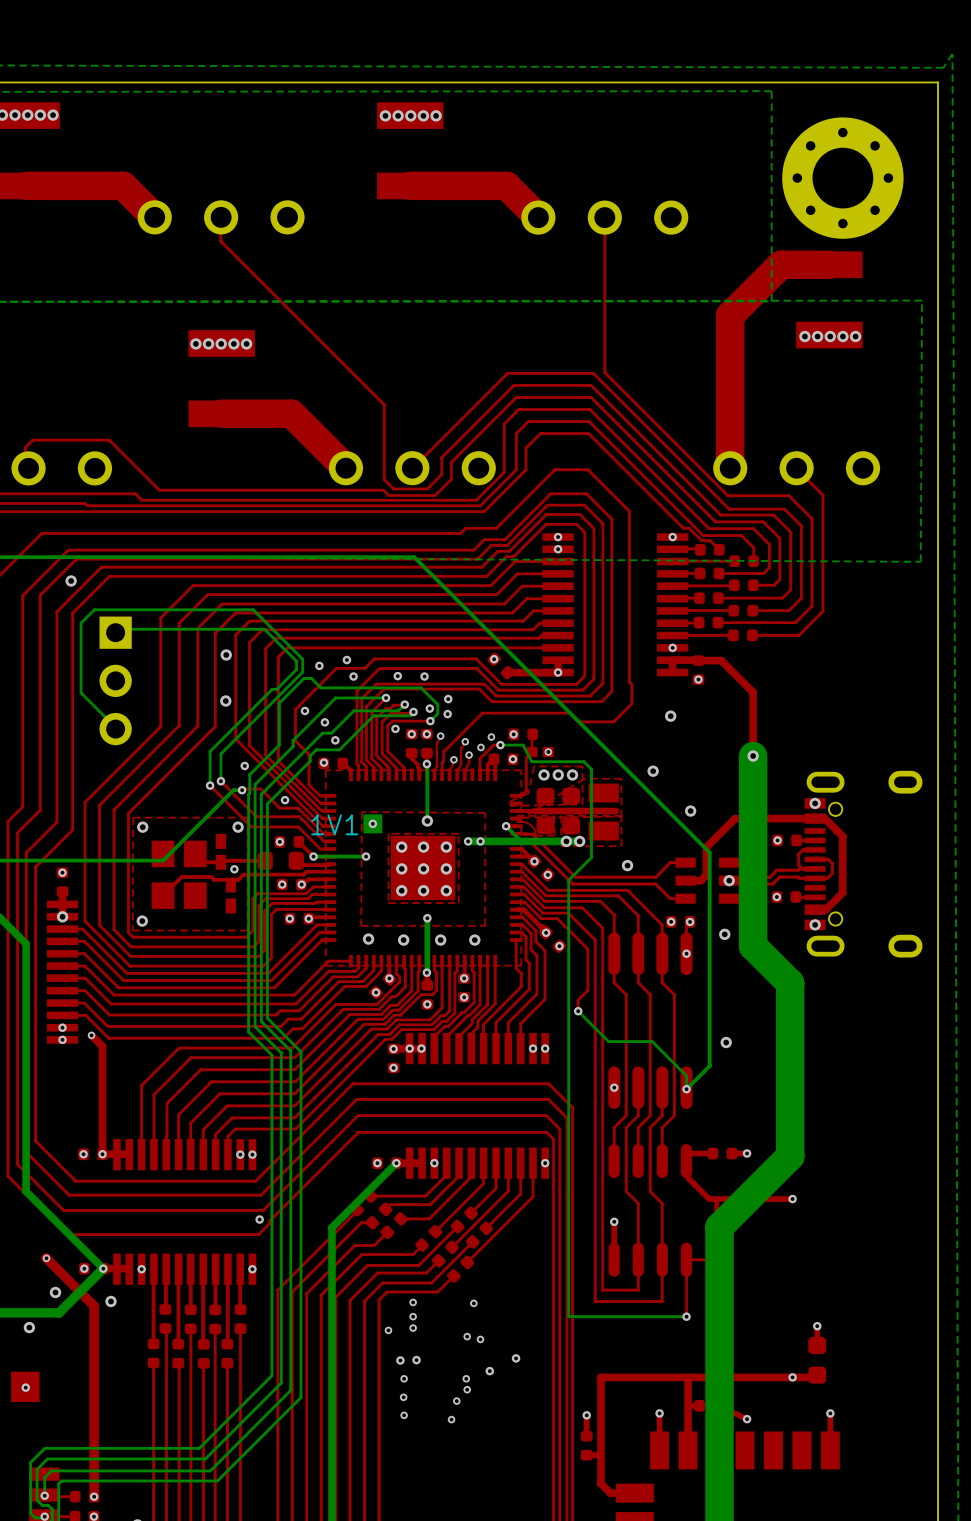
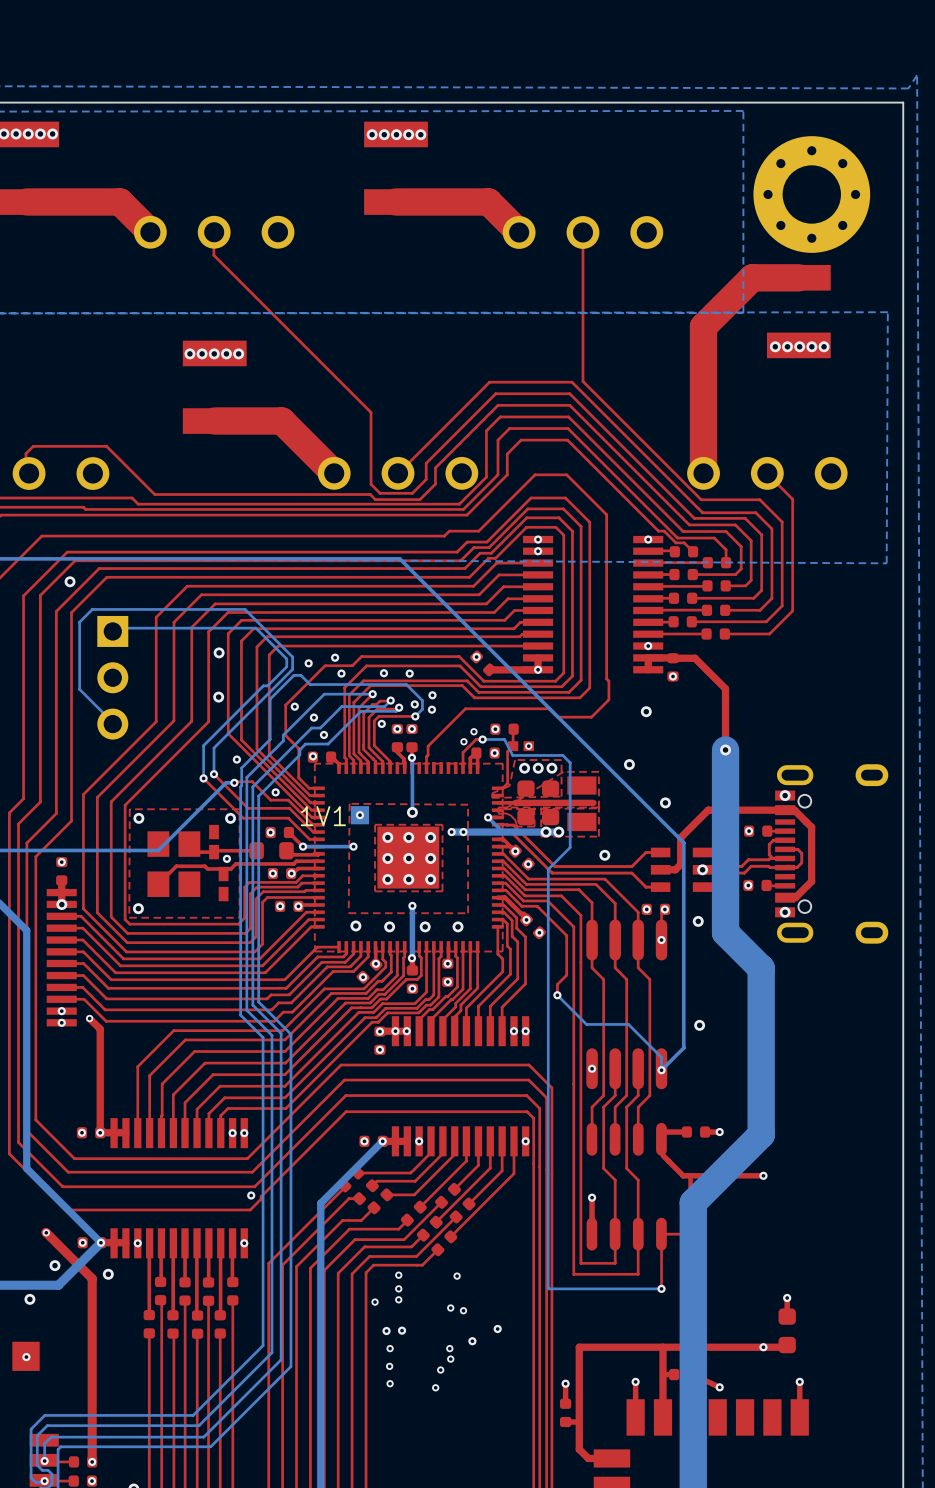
top track: (440, 736) (436, 743) (436, 766) (434, 771) -> none
via: (440, 736) -> none
top track: (465, 741) (461, 748) (461, 764) (457, 771) -> none
via: (465, 741) -> none
top track: (469, 755) (469, 762) (464, 771) -> none
via: (469, 755) -> none
top track: (453, 759) (449, 771) -> none
via: (453, 759) -> none

